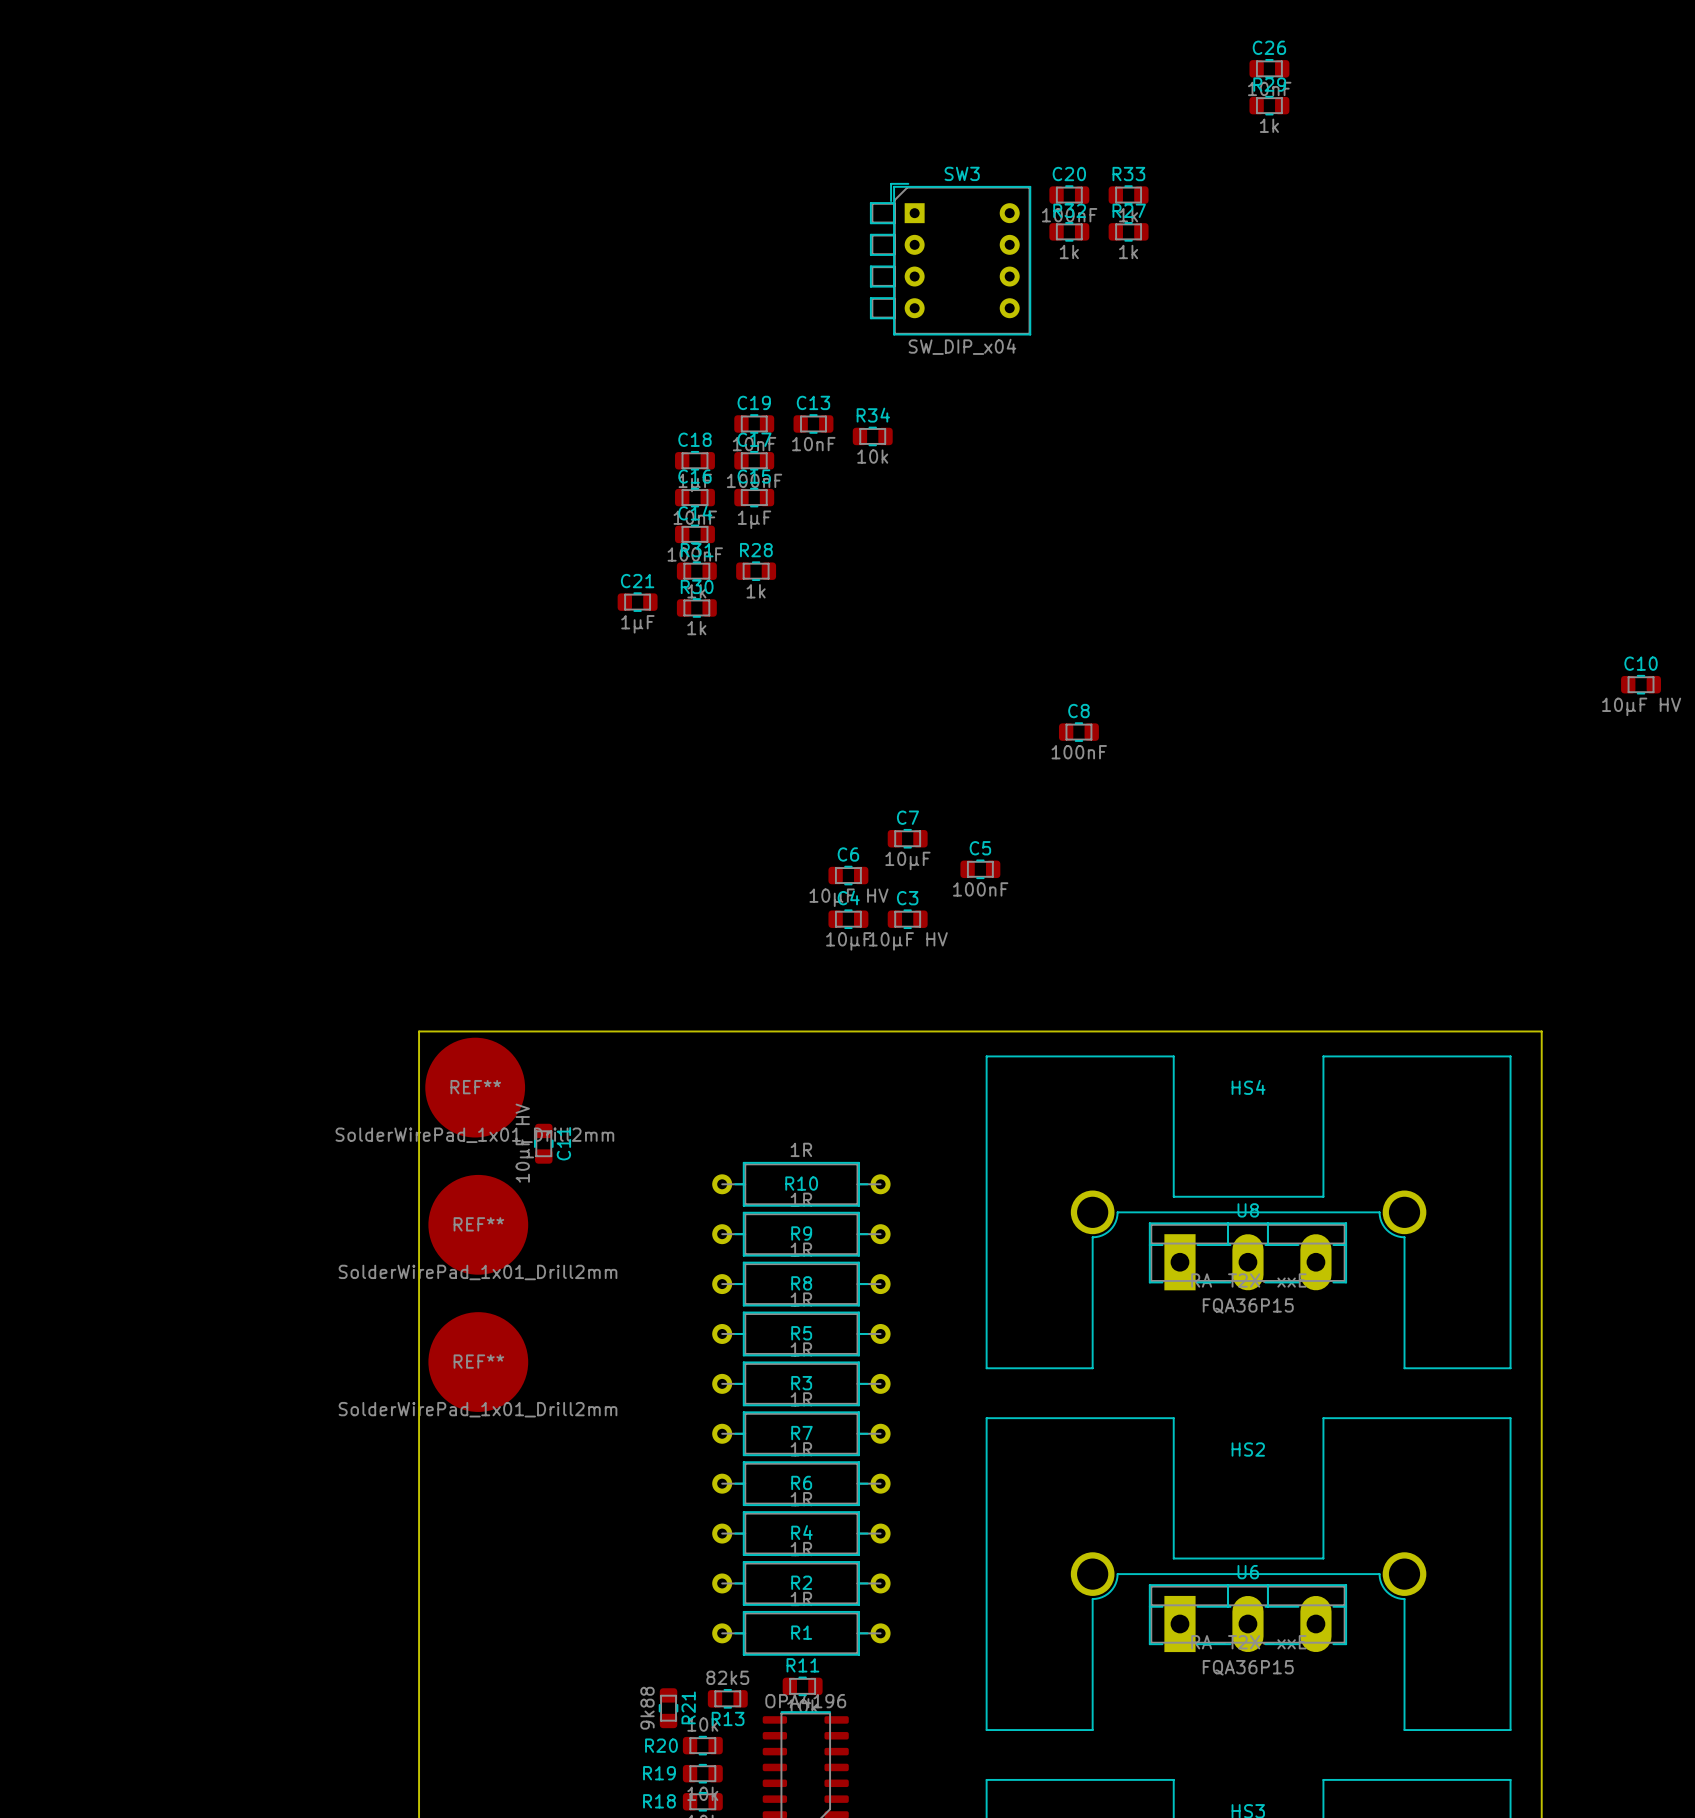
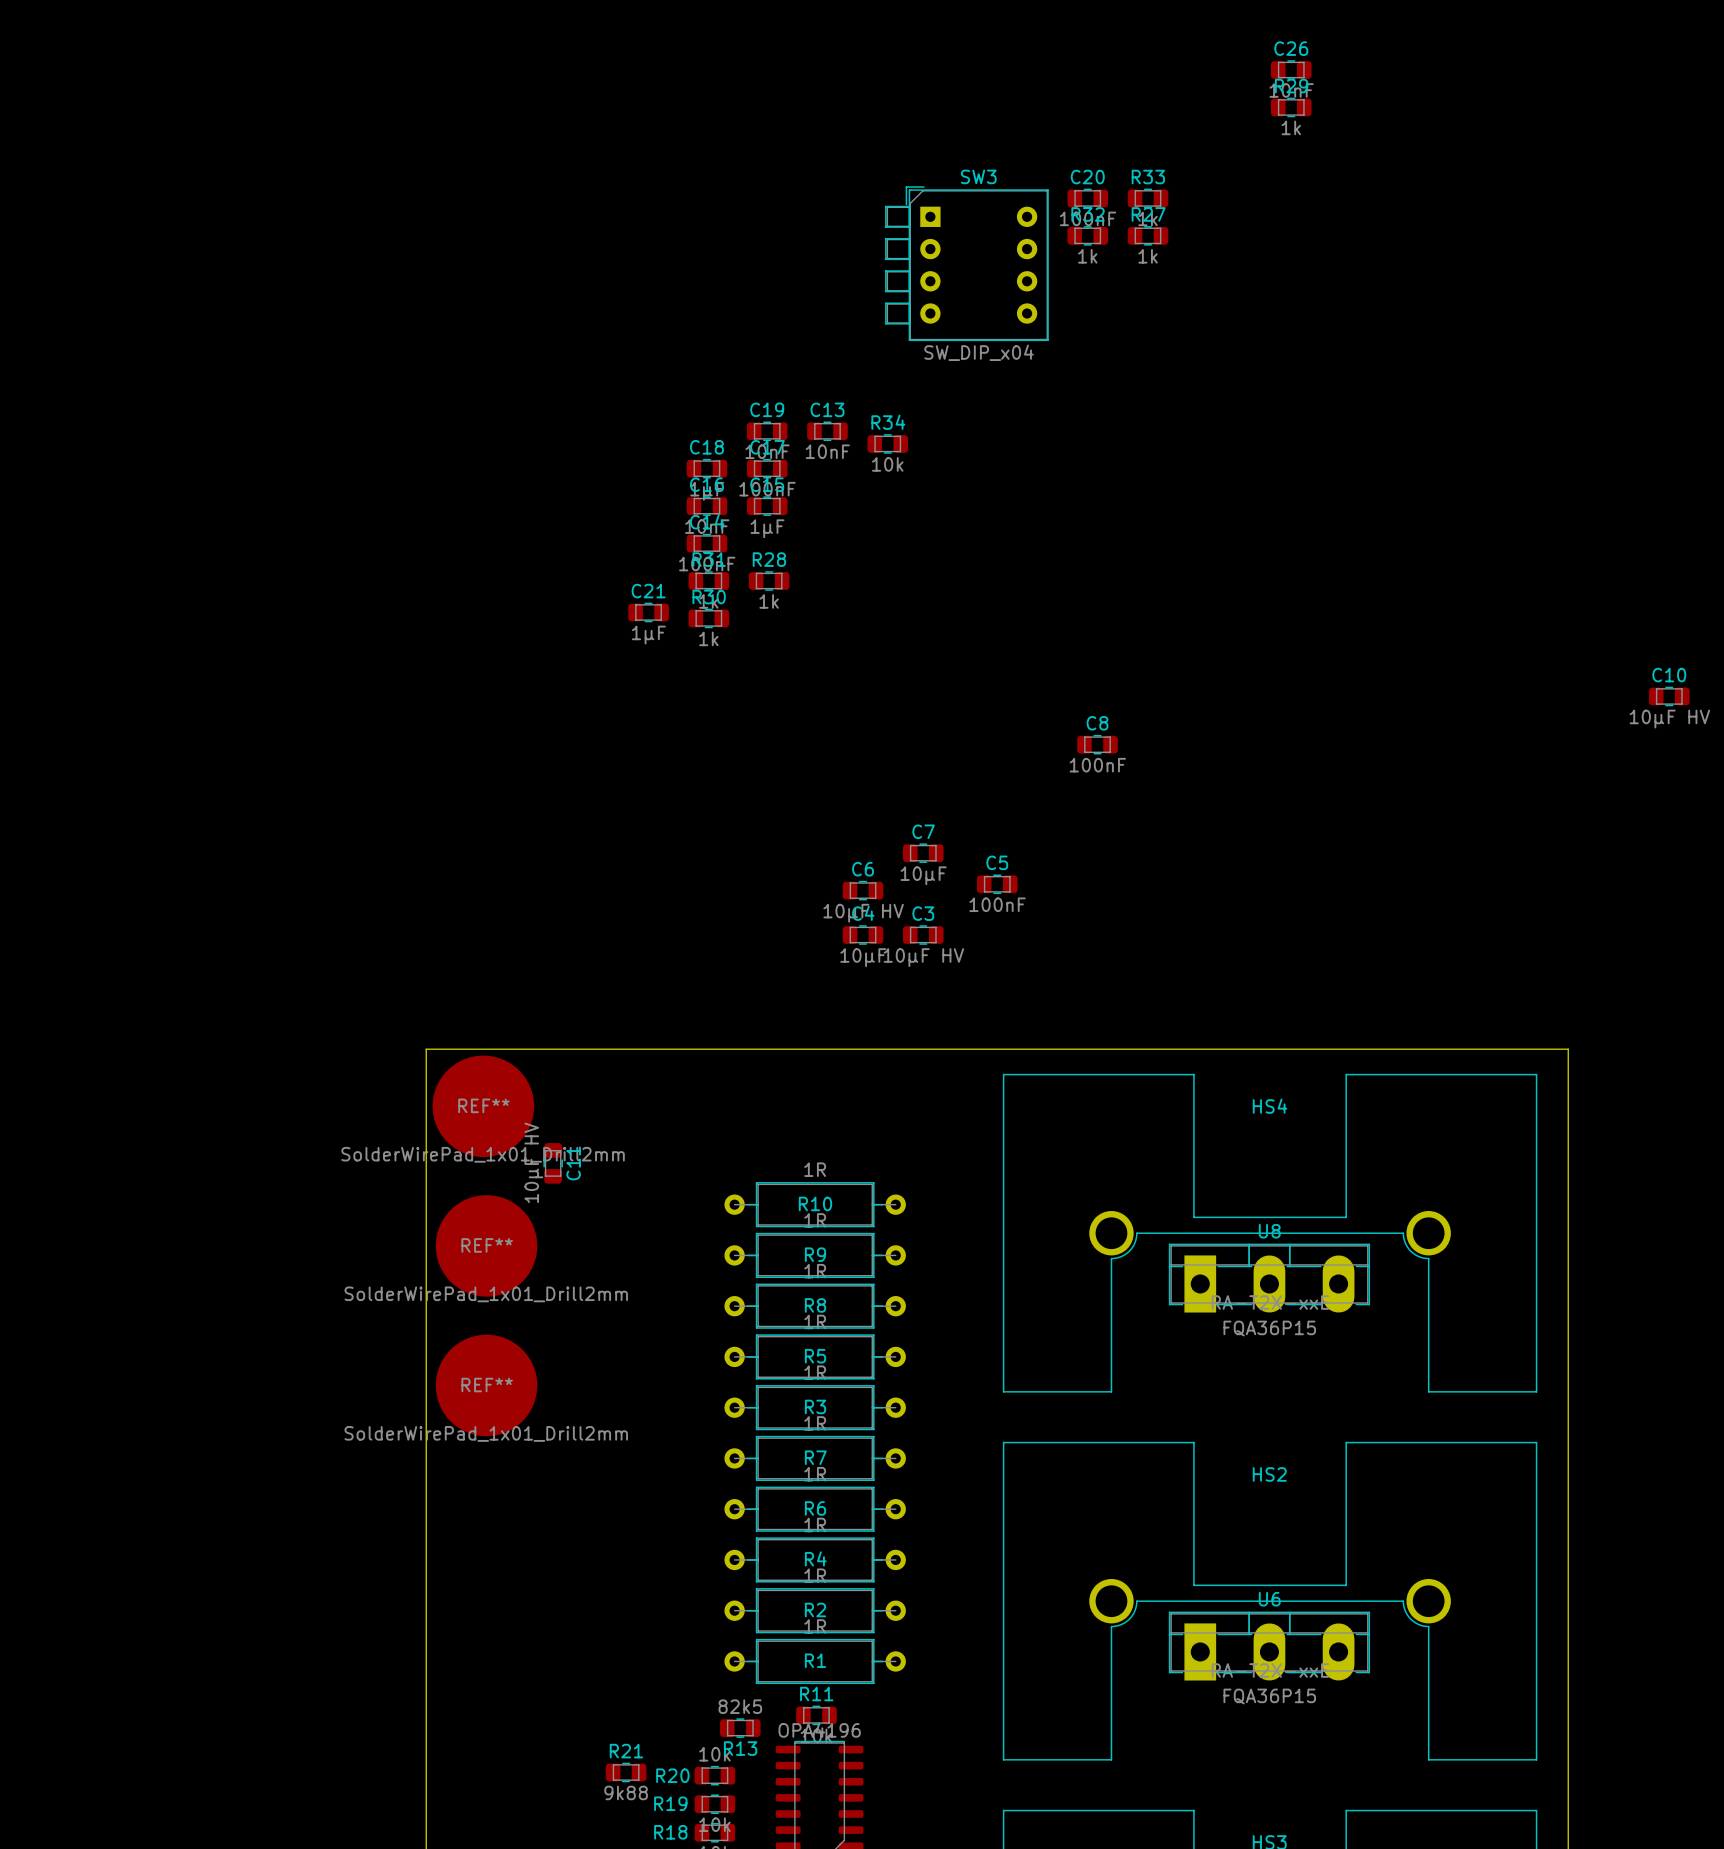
R21 name position: R21 (688, 1707) -> R21 (626, 1751)
R21 value position: 9k88 (647, 1708) -> 9k88 (626, 1792)
R21 rotation: 0° (668, 1708) -> 90° clockwise (626, 1772)
R21 position: (668, 1708) -> (626, 1772)

